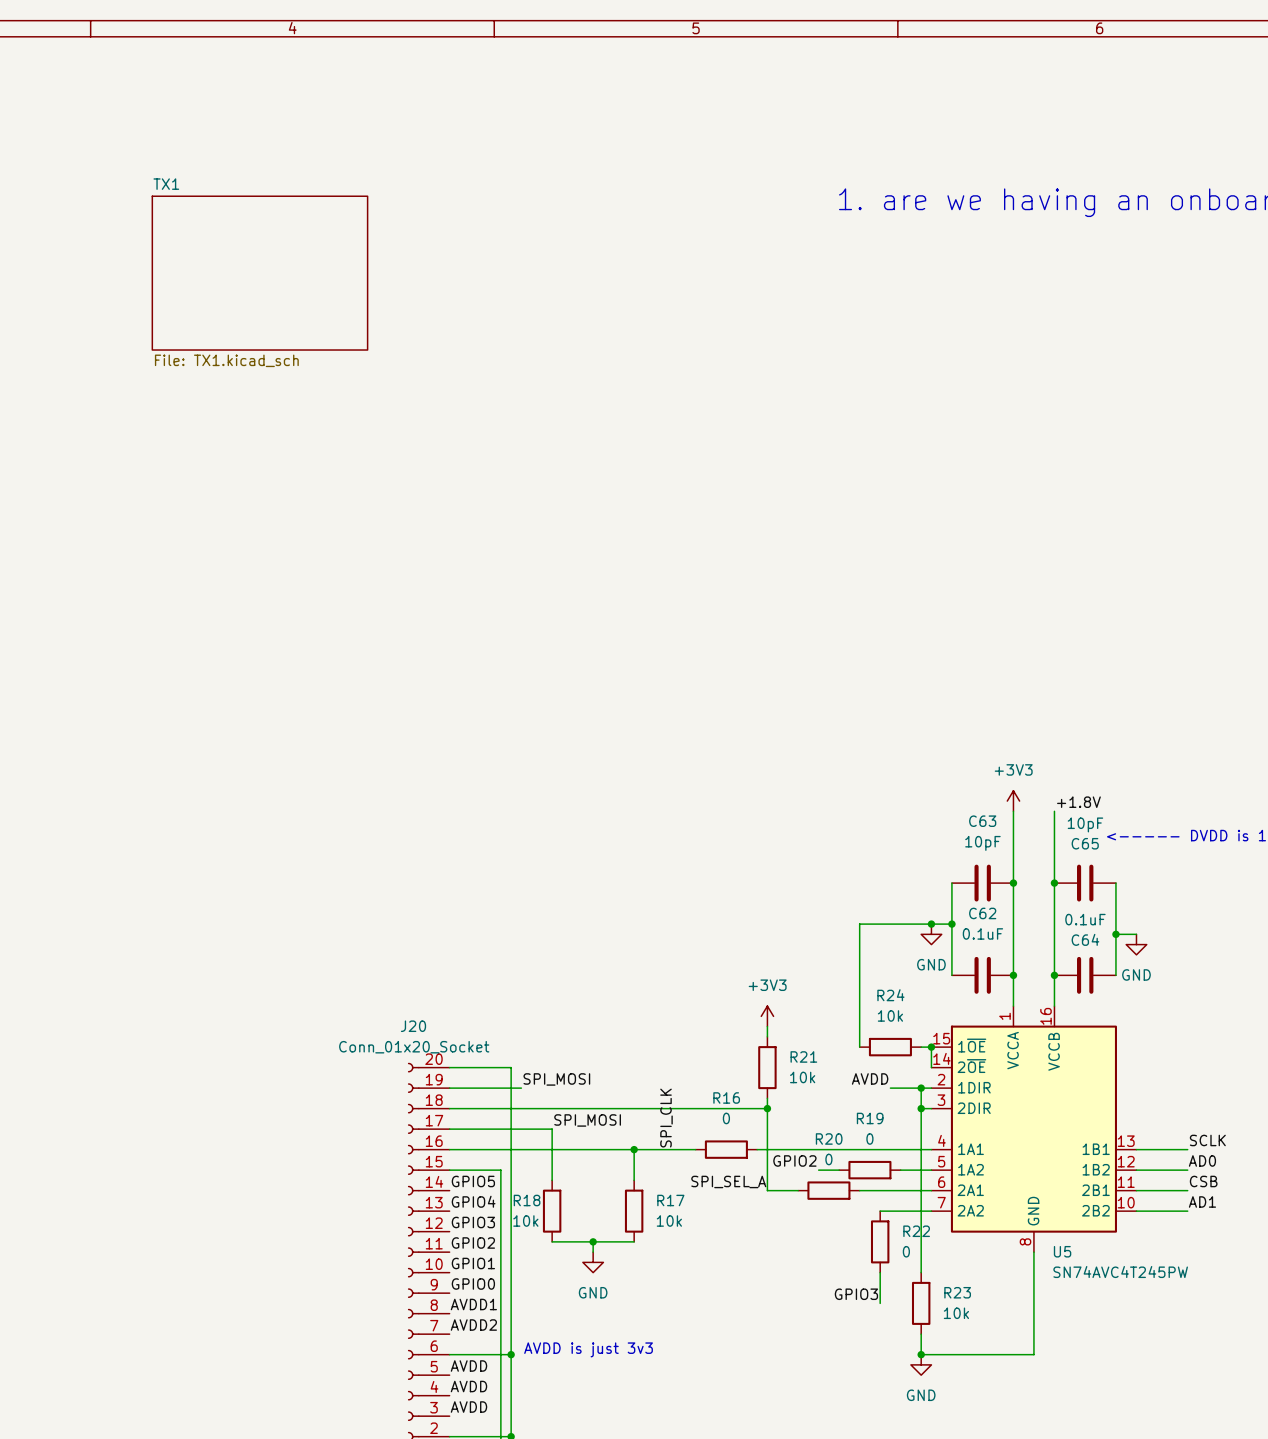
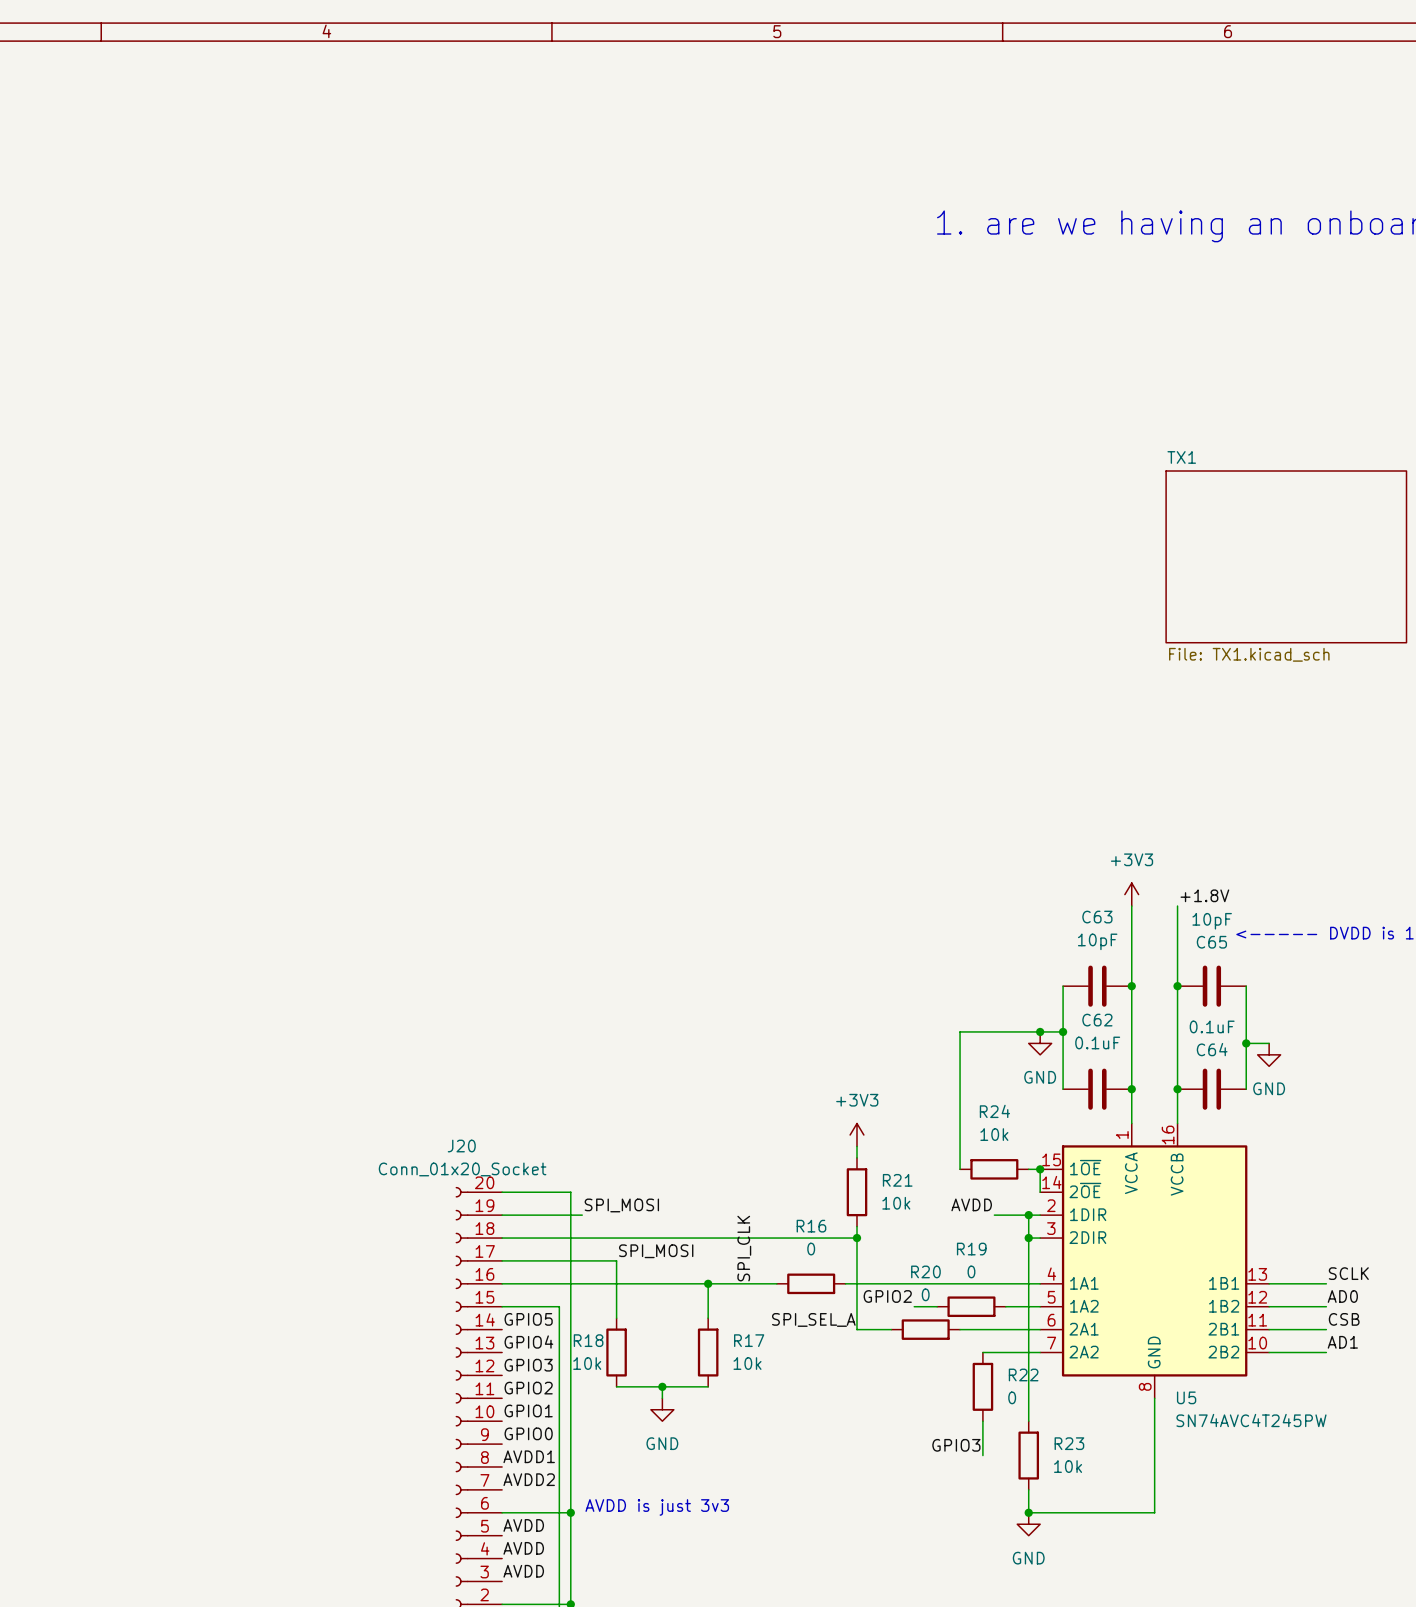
sheet TX1 position: (259, 273) -> (1286, 556)

